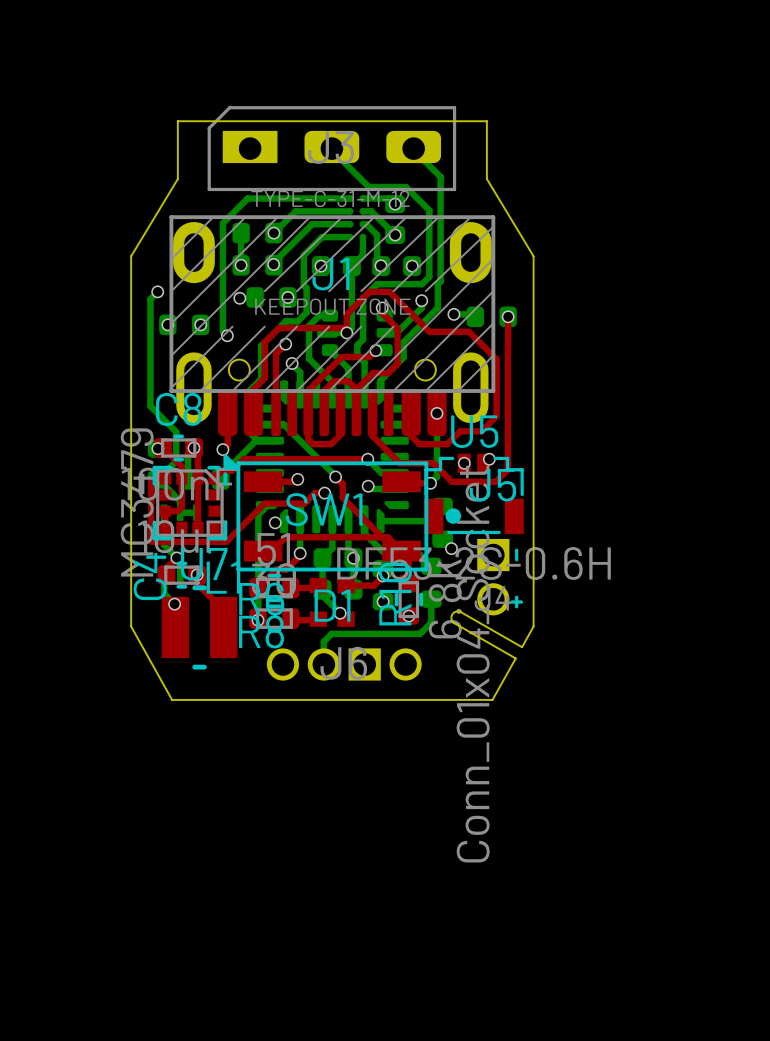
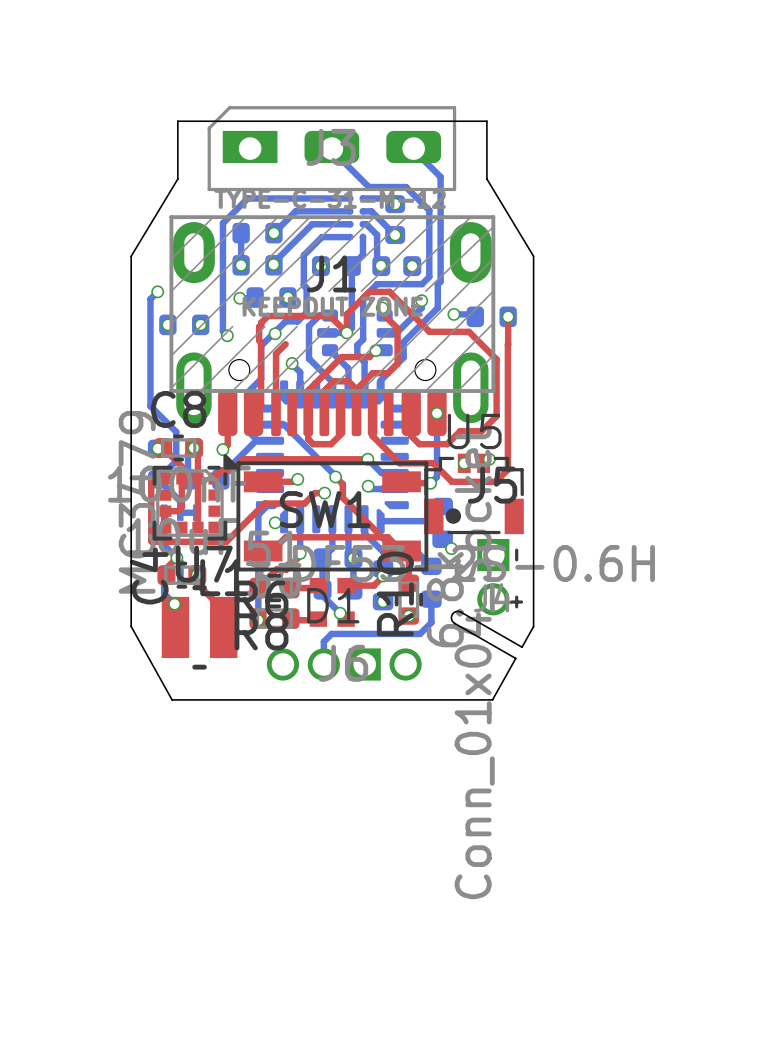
top track: (342, 328) (279, 328) (264, 342) (264, 378) (253, 389) (253, 412) -> (342, 328) (329, 316) (267, 316) (259, 327) (259, 340) (261, 342) (261, 405) (253, 412)
via position: (285, 344) -> (275, 333)

